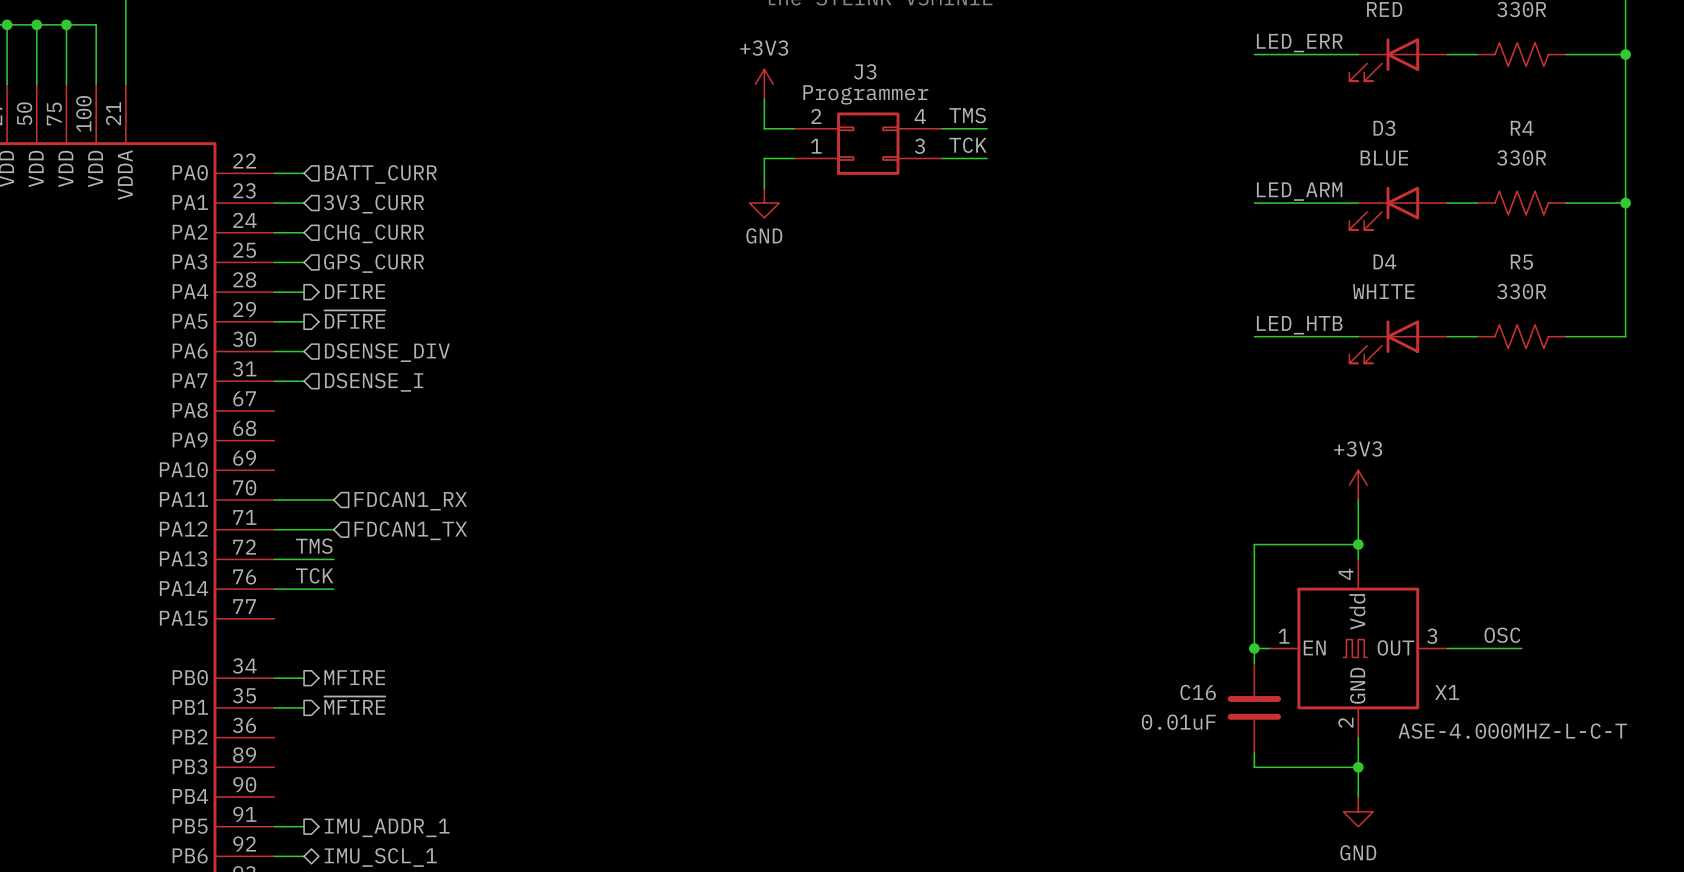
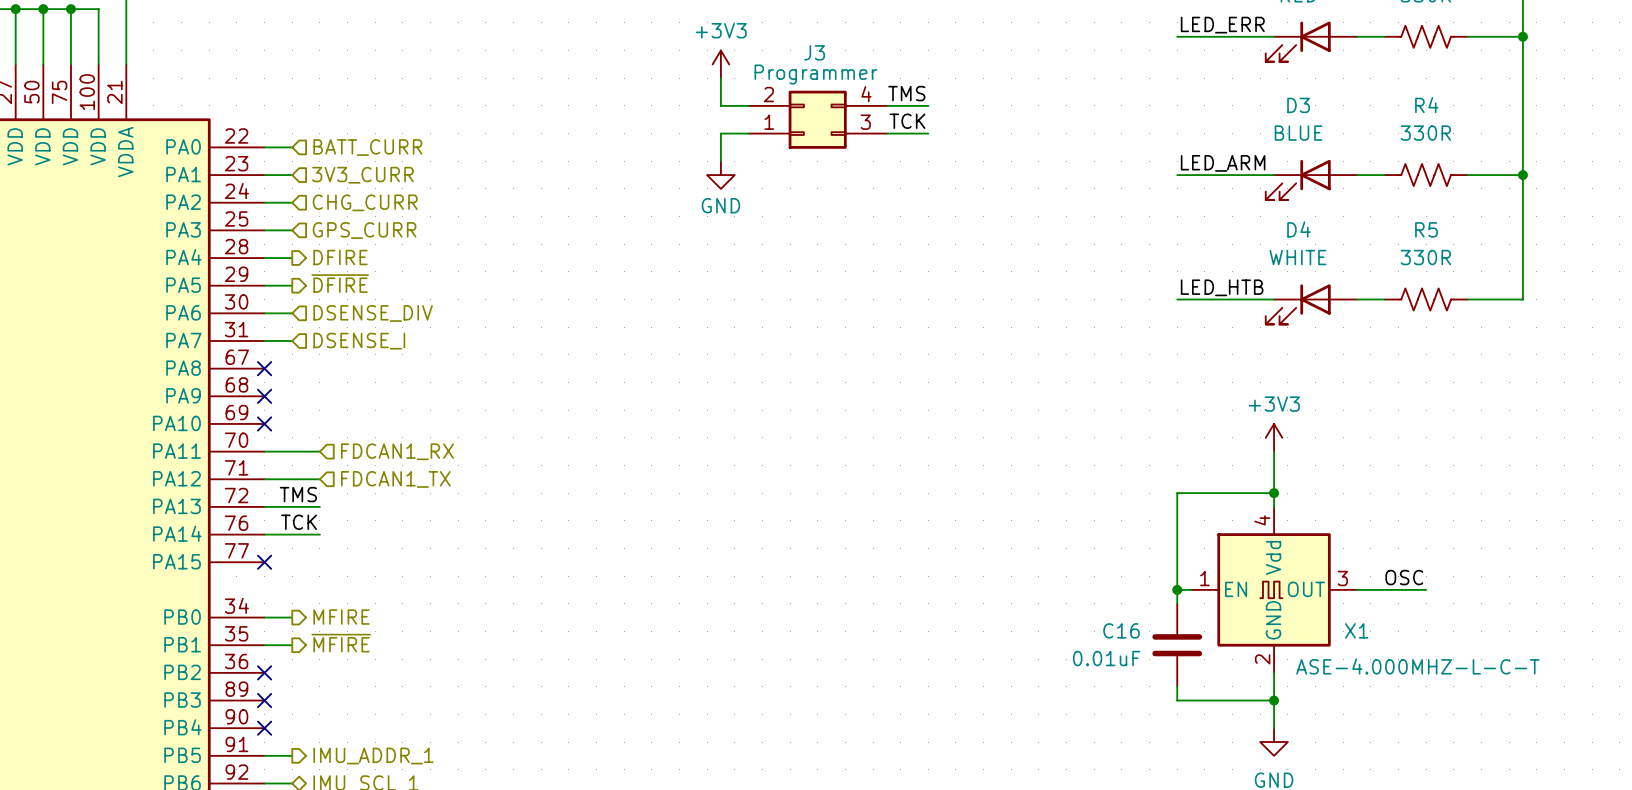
no-connect mark: none -> (264, 368)
no-connect mark: none -> (264, 396)
no-connect mark: none -> (264, 423)
no-connect mark: none -> (264, 562)
no-connect mark: none -> (264, 672)
no-connect mark: none -> (264, 700)
no-connect mark: none -> (264, 728)

